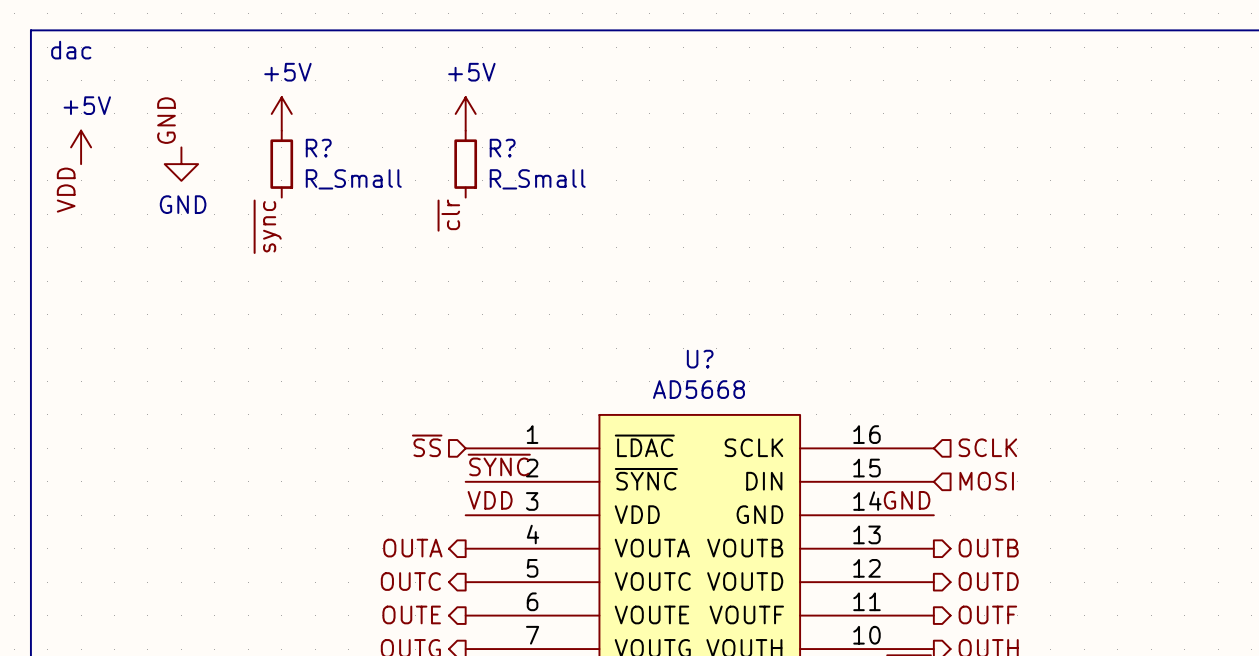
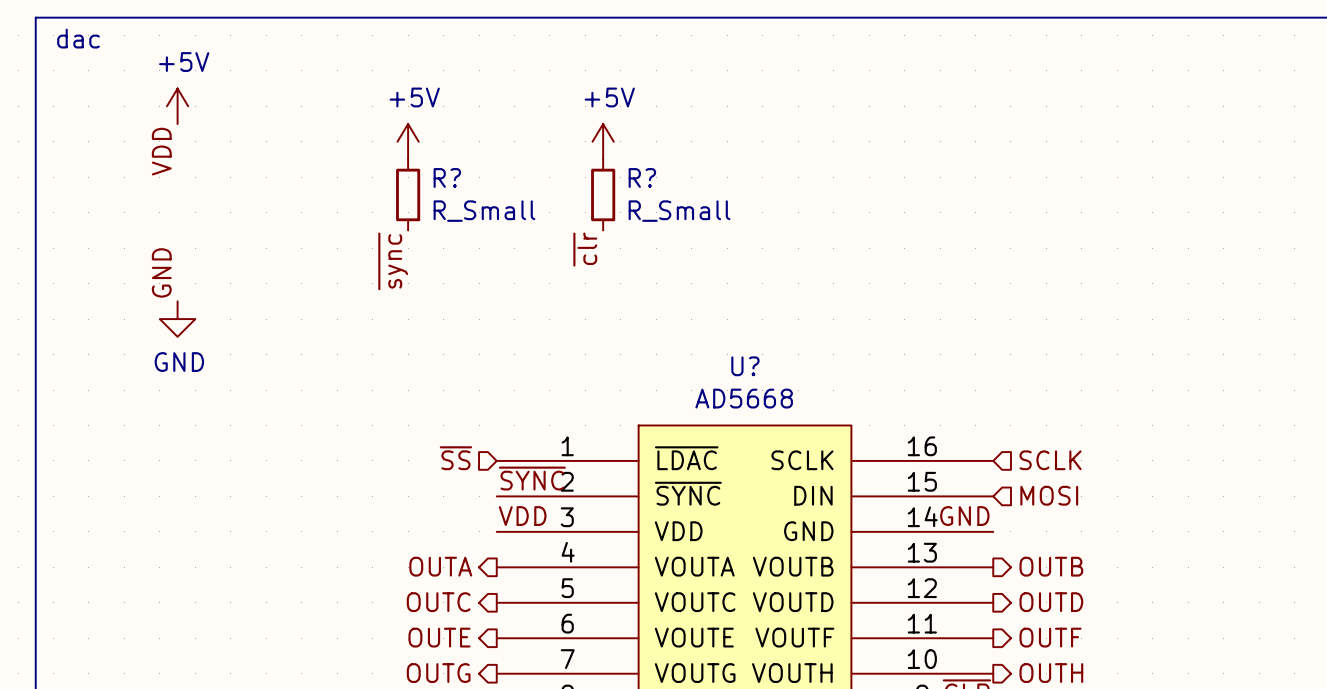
power symbol: none -> +5V (177, 106)
power symbol: +5V (281, 113) -> none
power symbol: +5V (465, 113) -> none
label position: GND (166, 120) -> GND (161, 272)
power symbol: +5V (81, 147) -> none
power symbol: none -> +5V (408, 141)
power symbol: none -> +5V (603, 141)
power symbol position: GND (181, 164) -> GND (177, 319)
R?: R_Small (281, 164) -> none
R?: R_Small (465, 164) -> none
label position: VDD (66, 190) -> VDD (161, 151)
R?: none -> R_Small (408, 194)
R?: none -> R_Small (603, 194)
label position: ~{clr} (448, 215) -> ~{clr} (585, 249)
label position: ~{sync} (267, 226) -> ~{sync} (393, 261)

